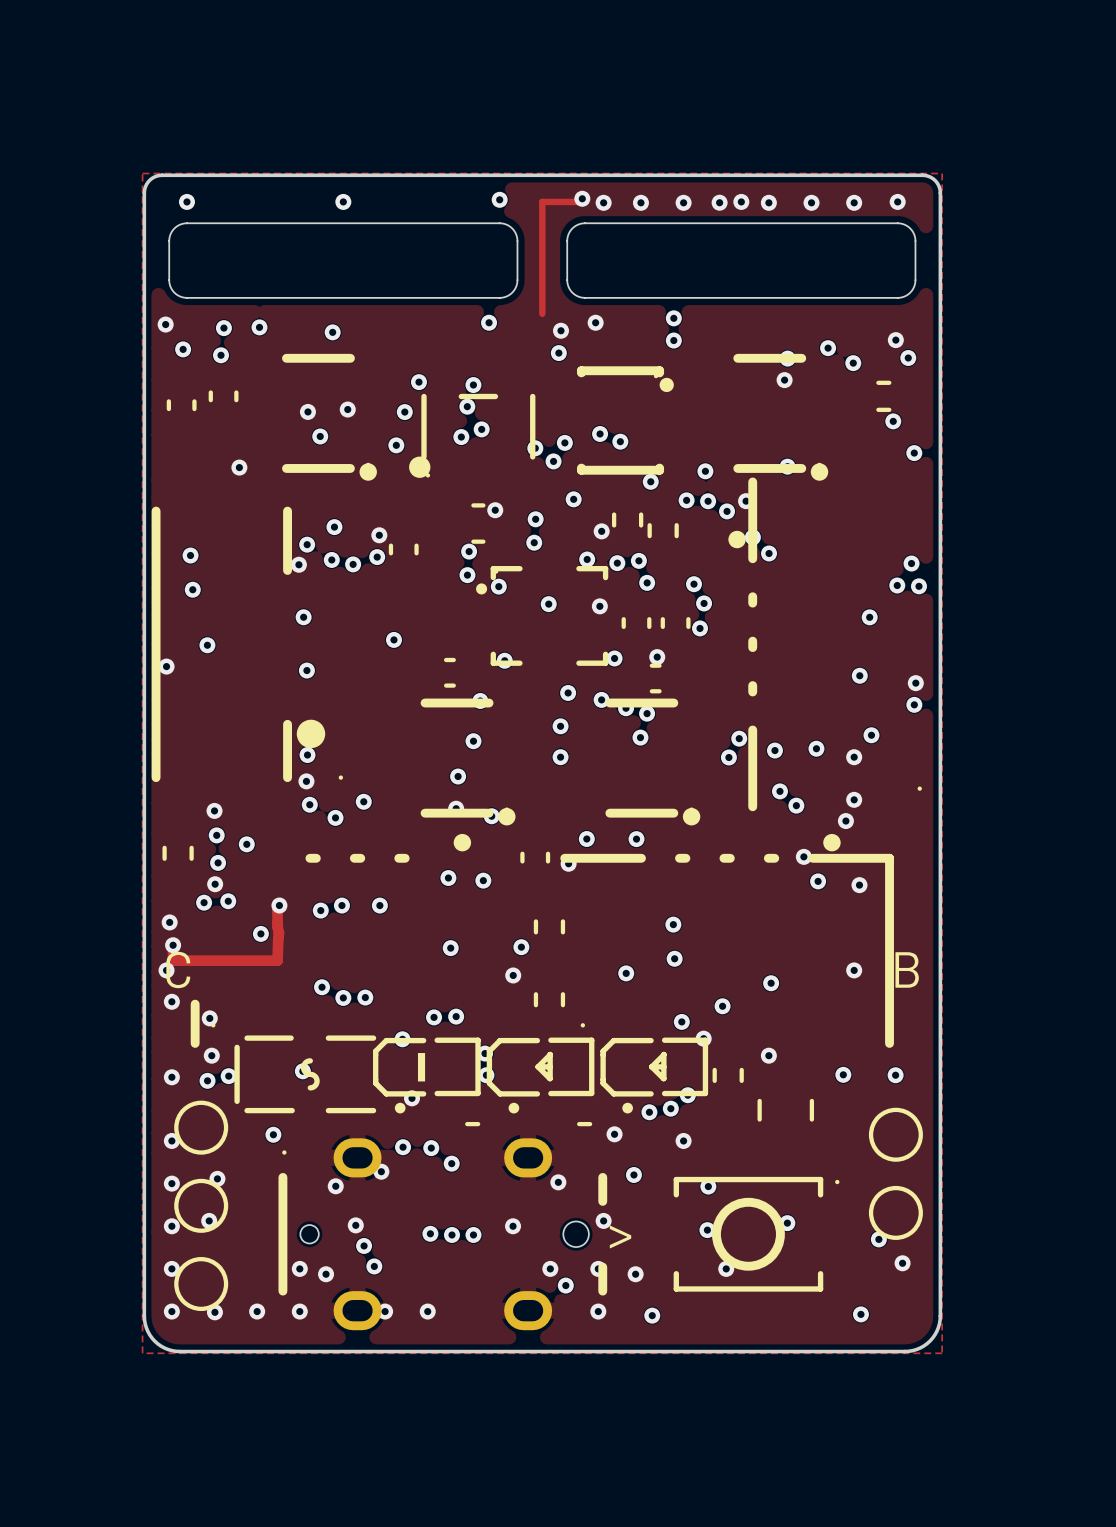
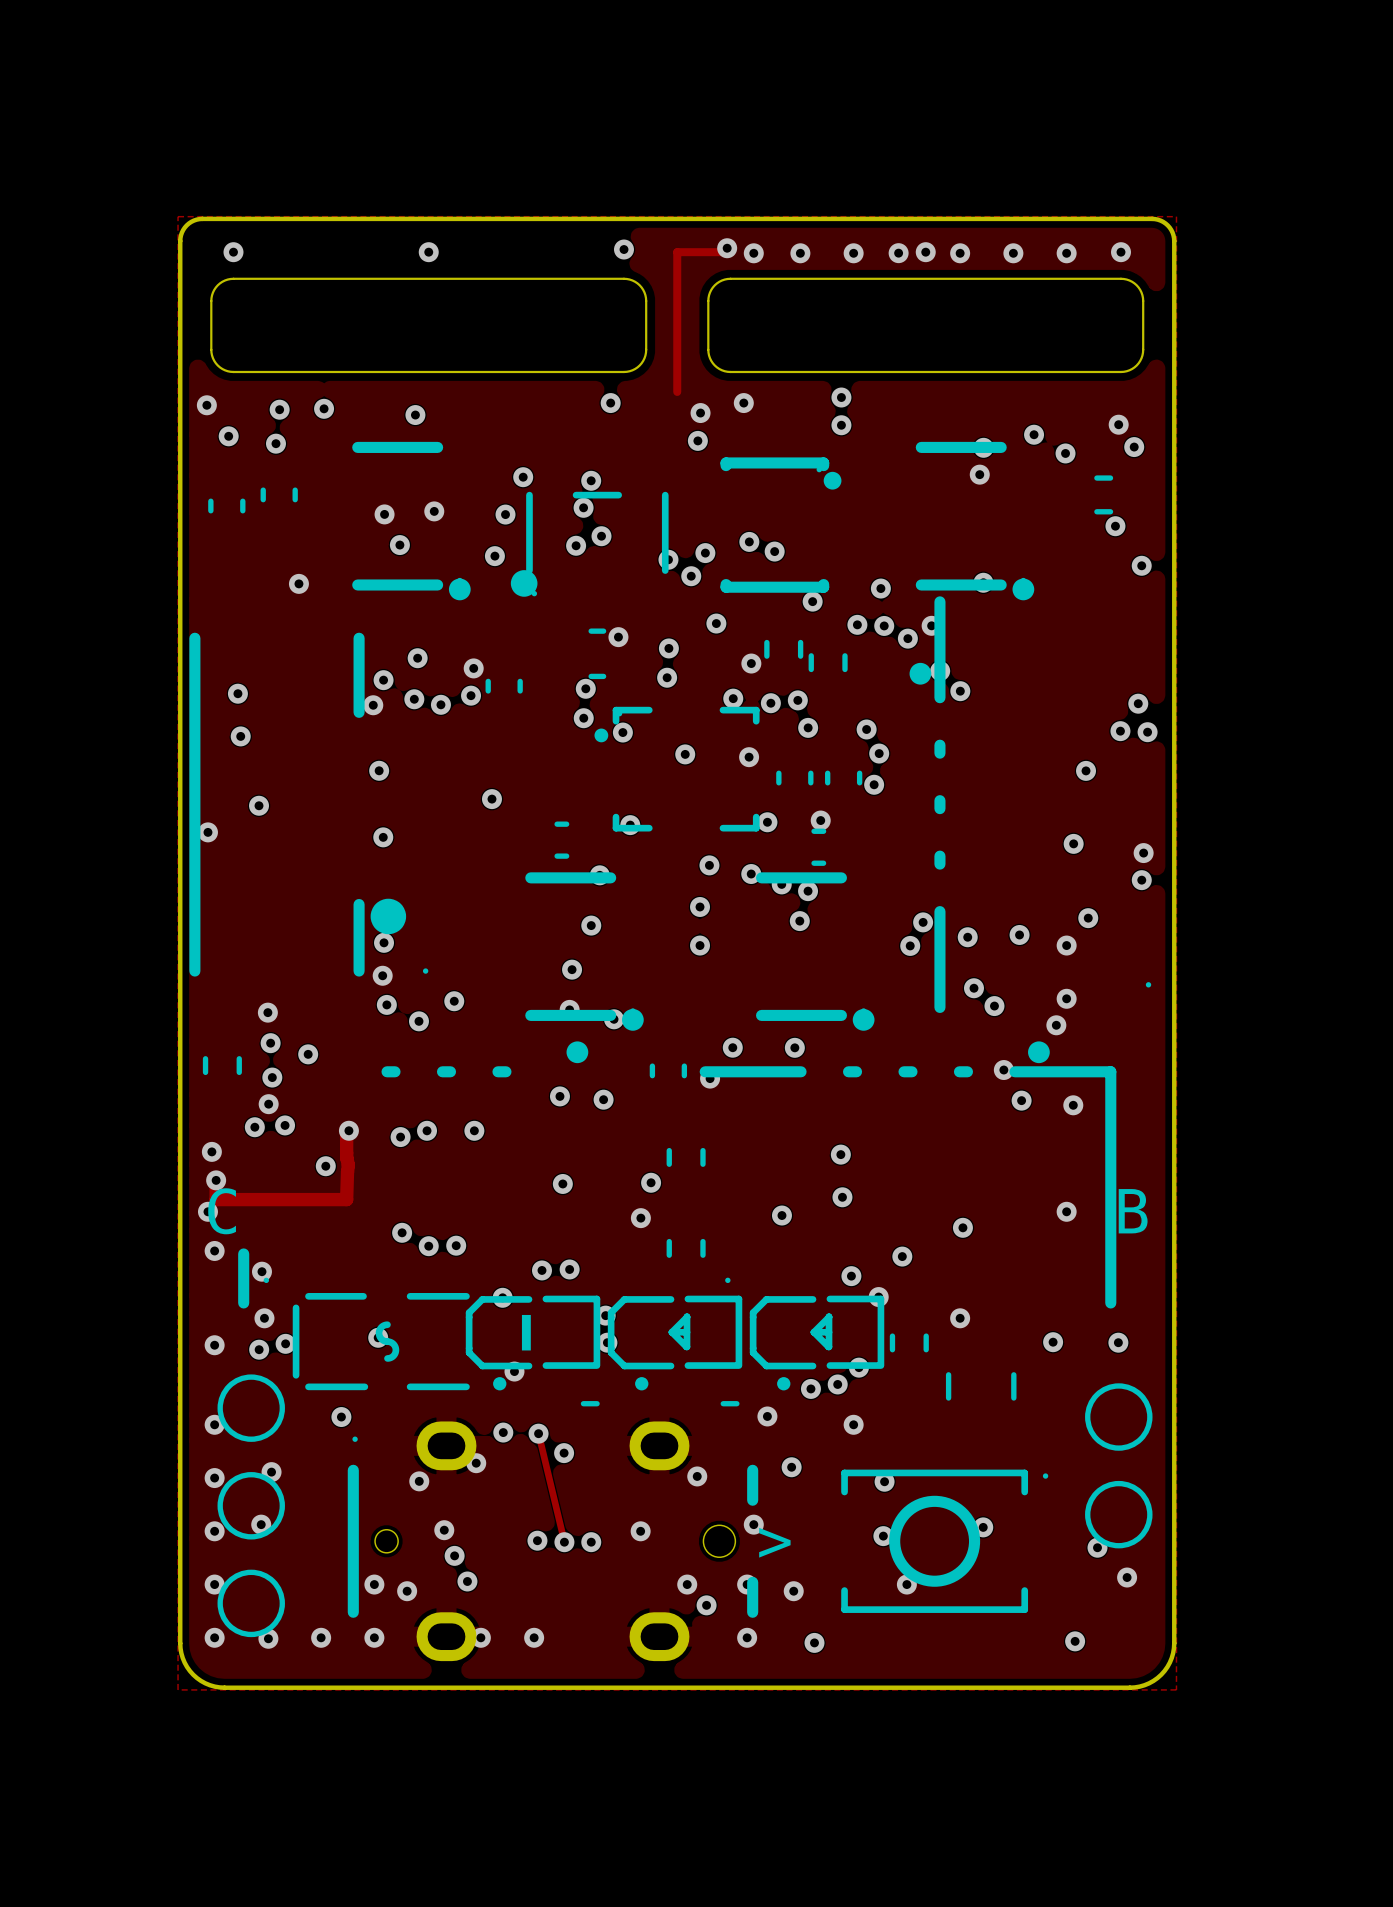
track: none -> (538, 1433) (564, 1542)

